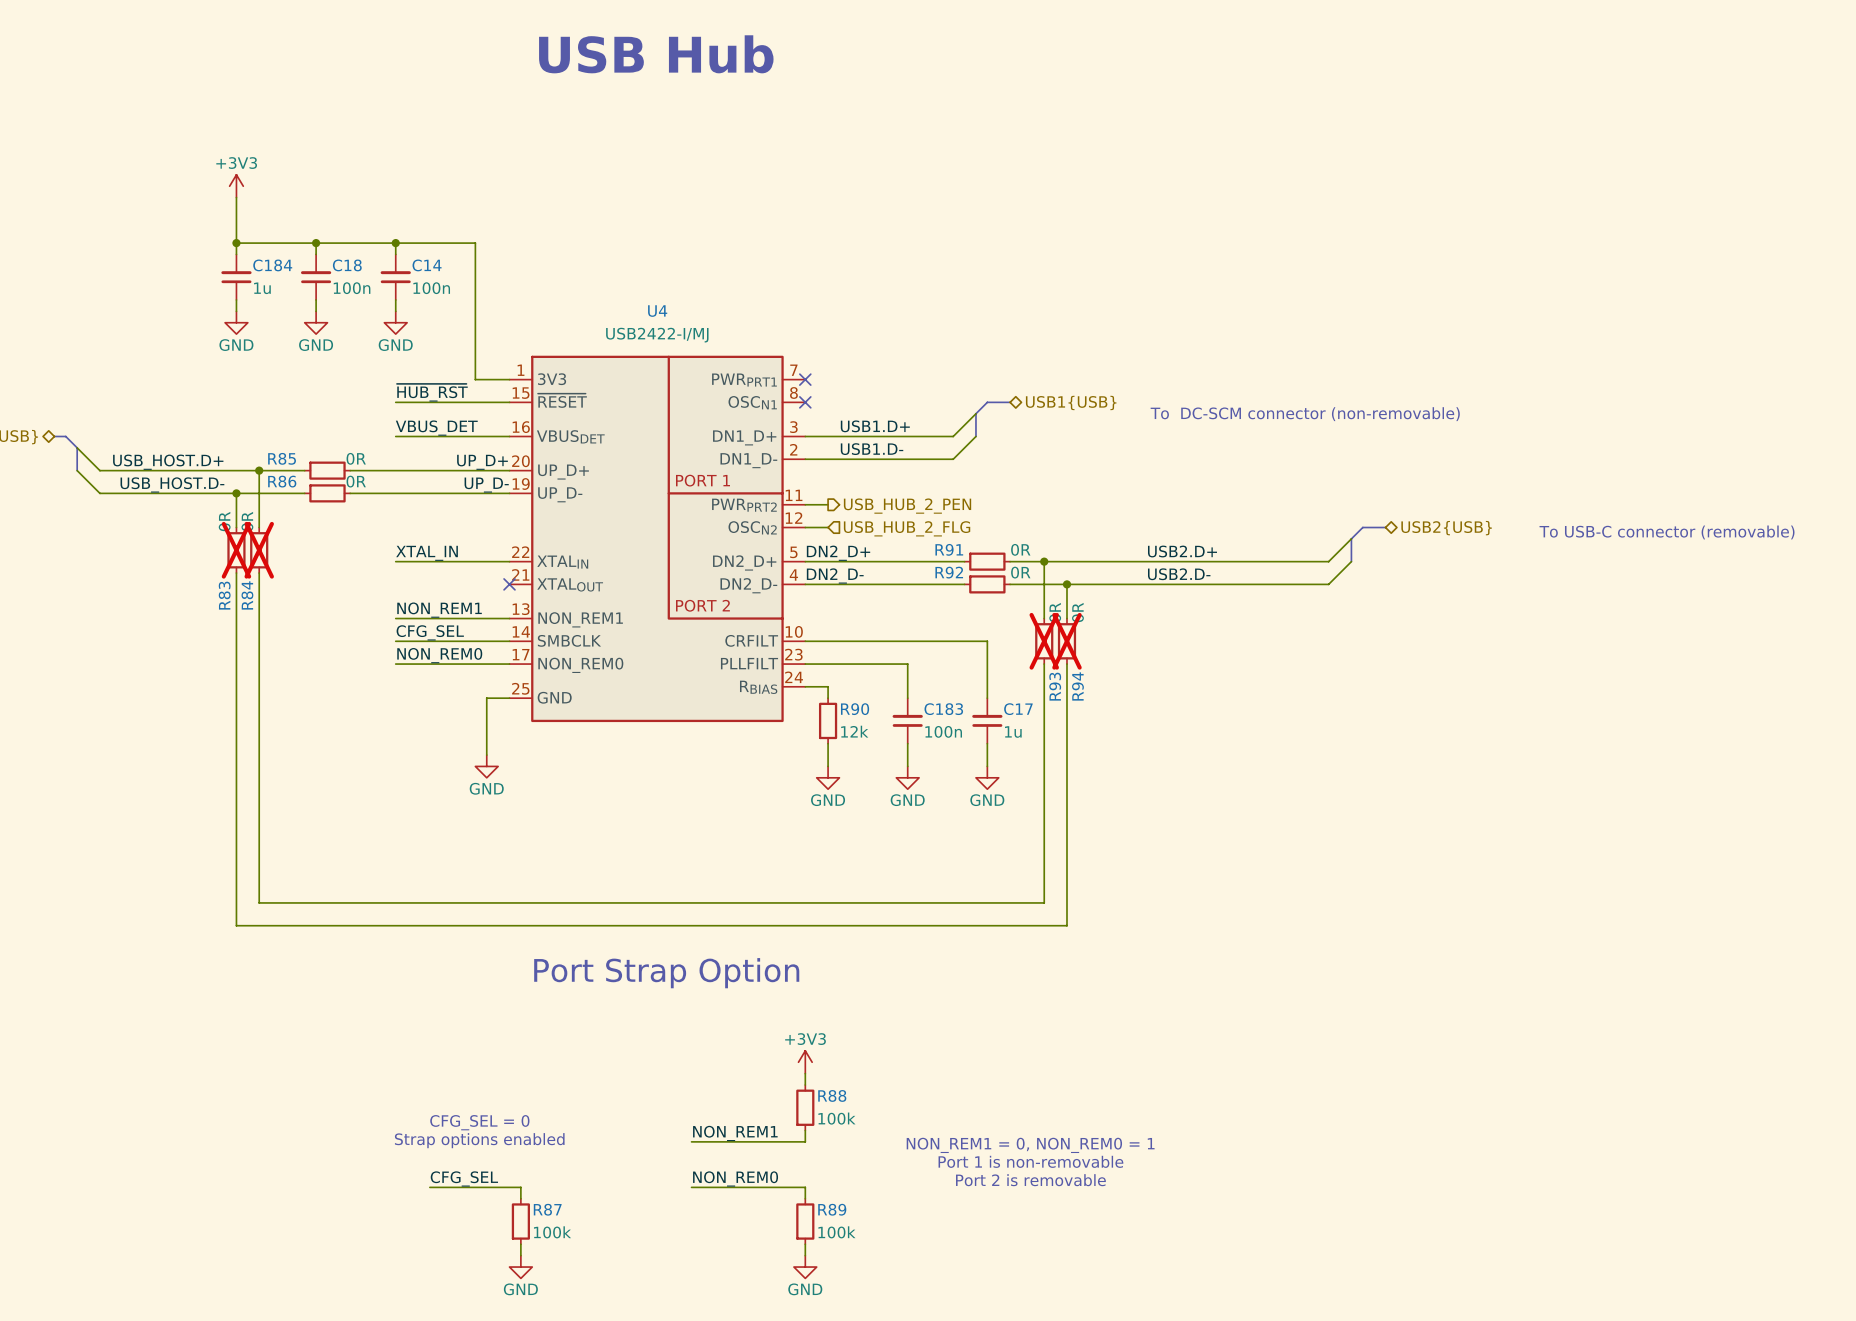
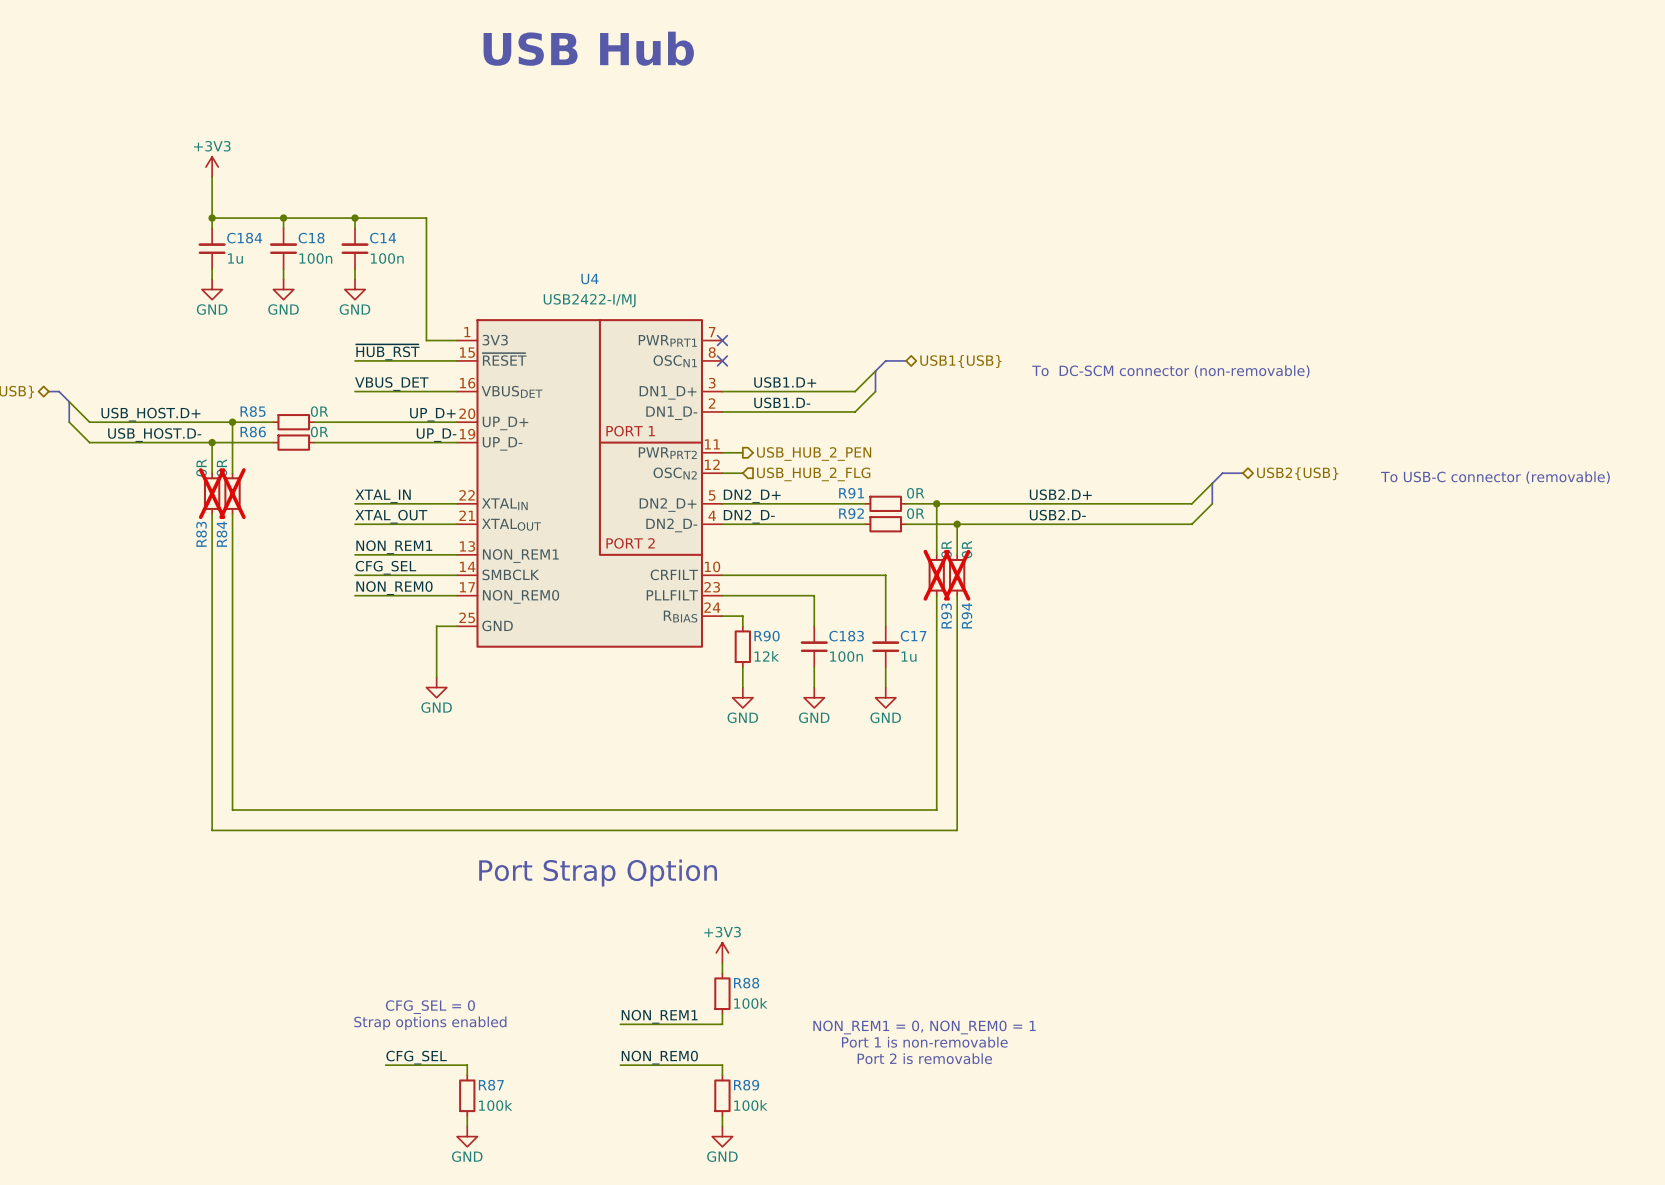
label: none -> XTAL_OUT (391, 516)
wire: none -> (355, 524) (457, 524)
no-connect mark: (509, 584) -> none

